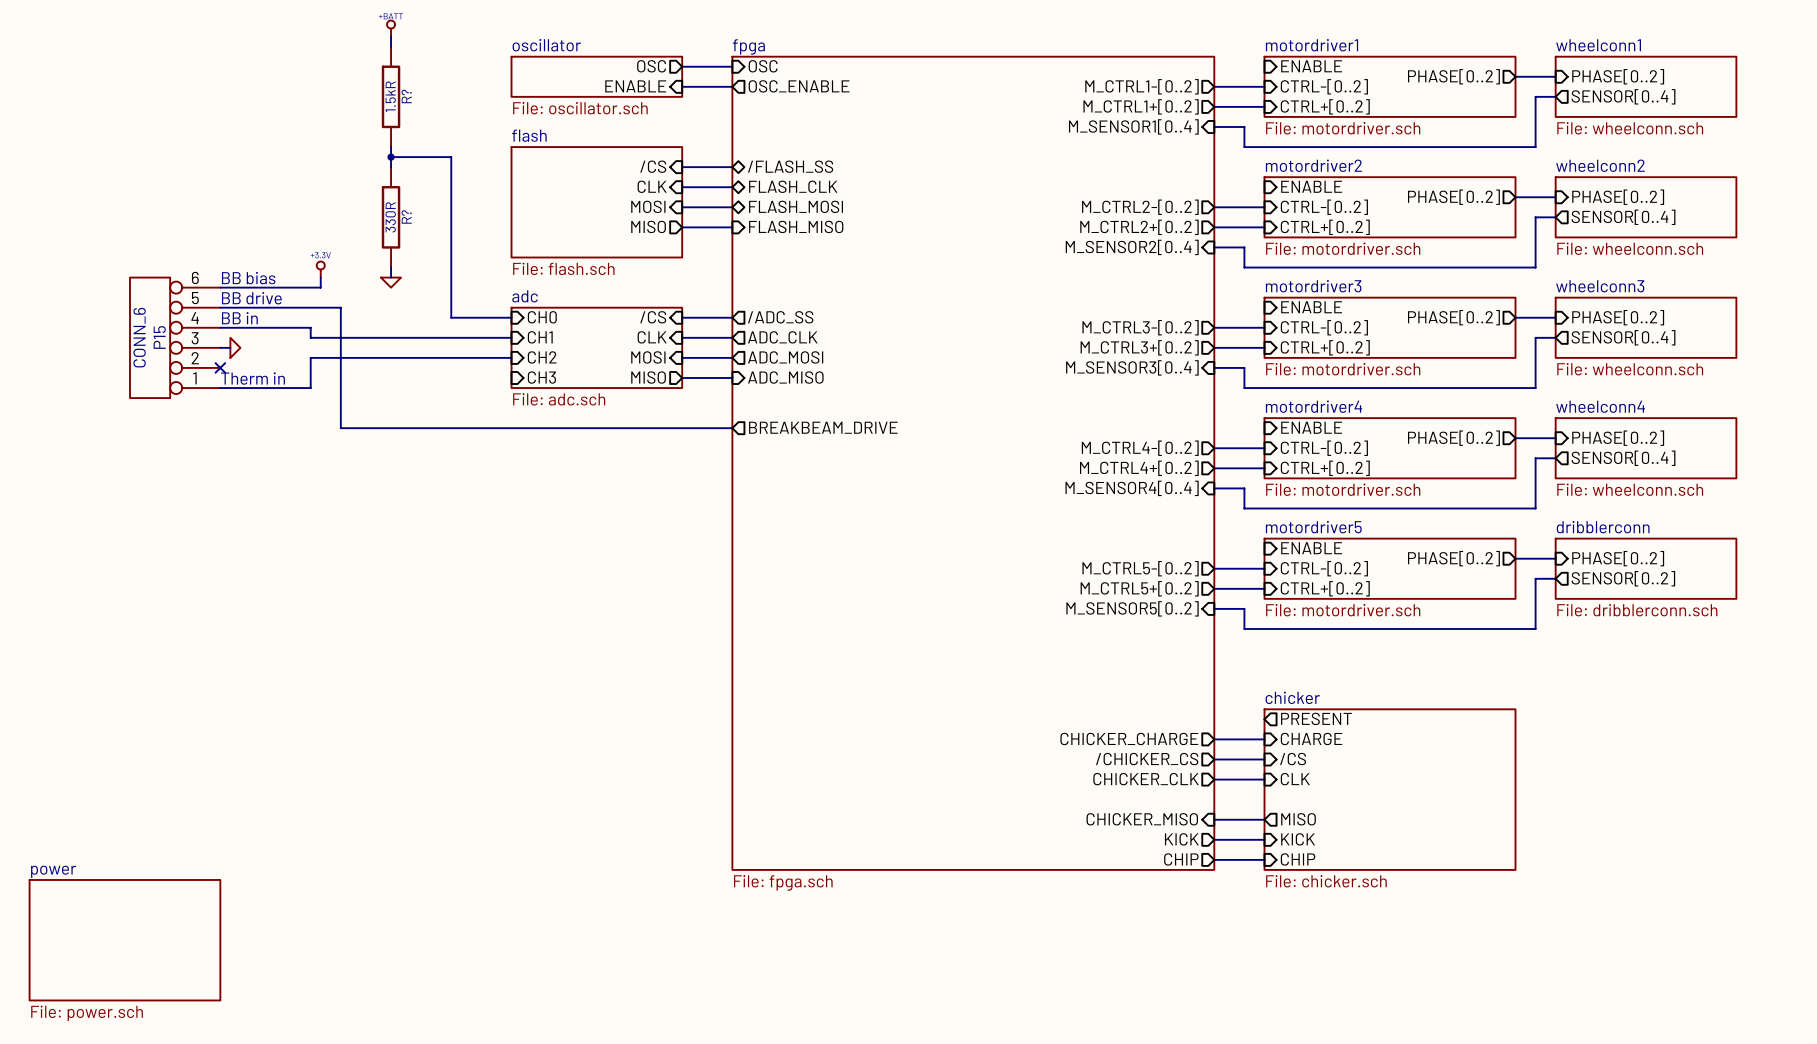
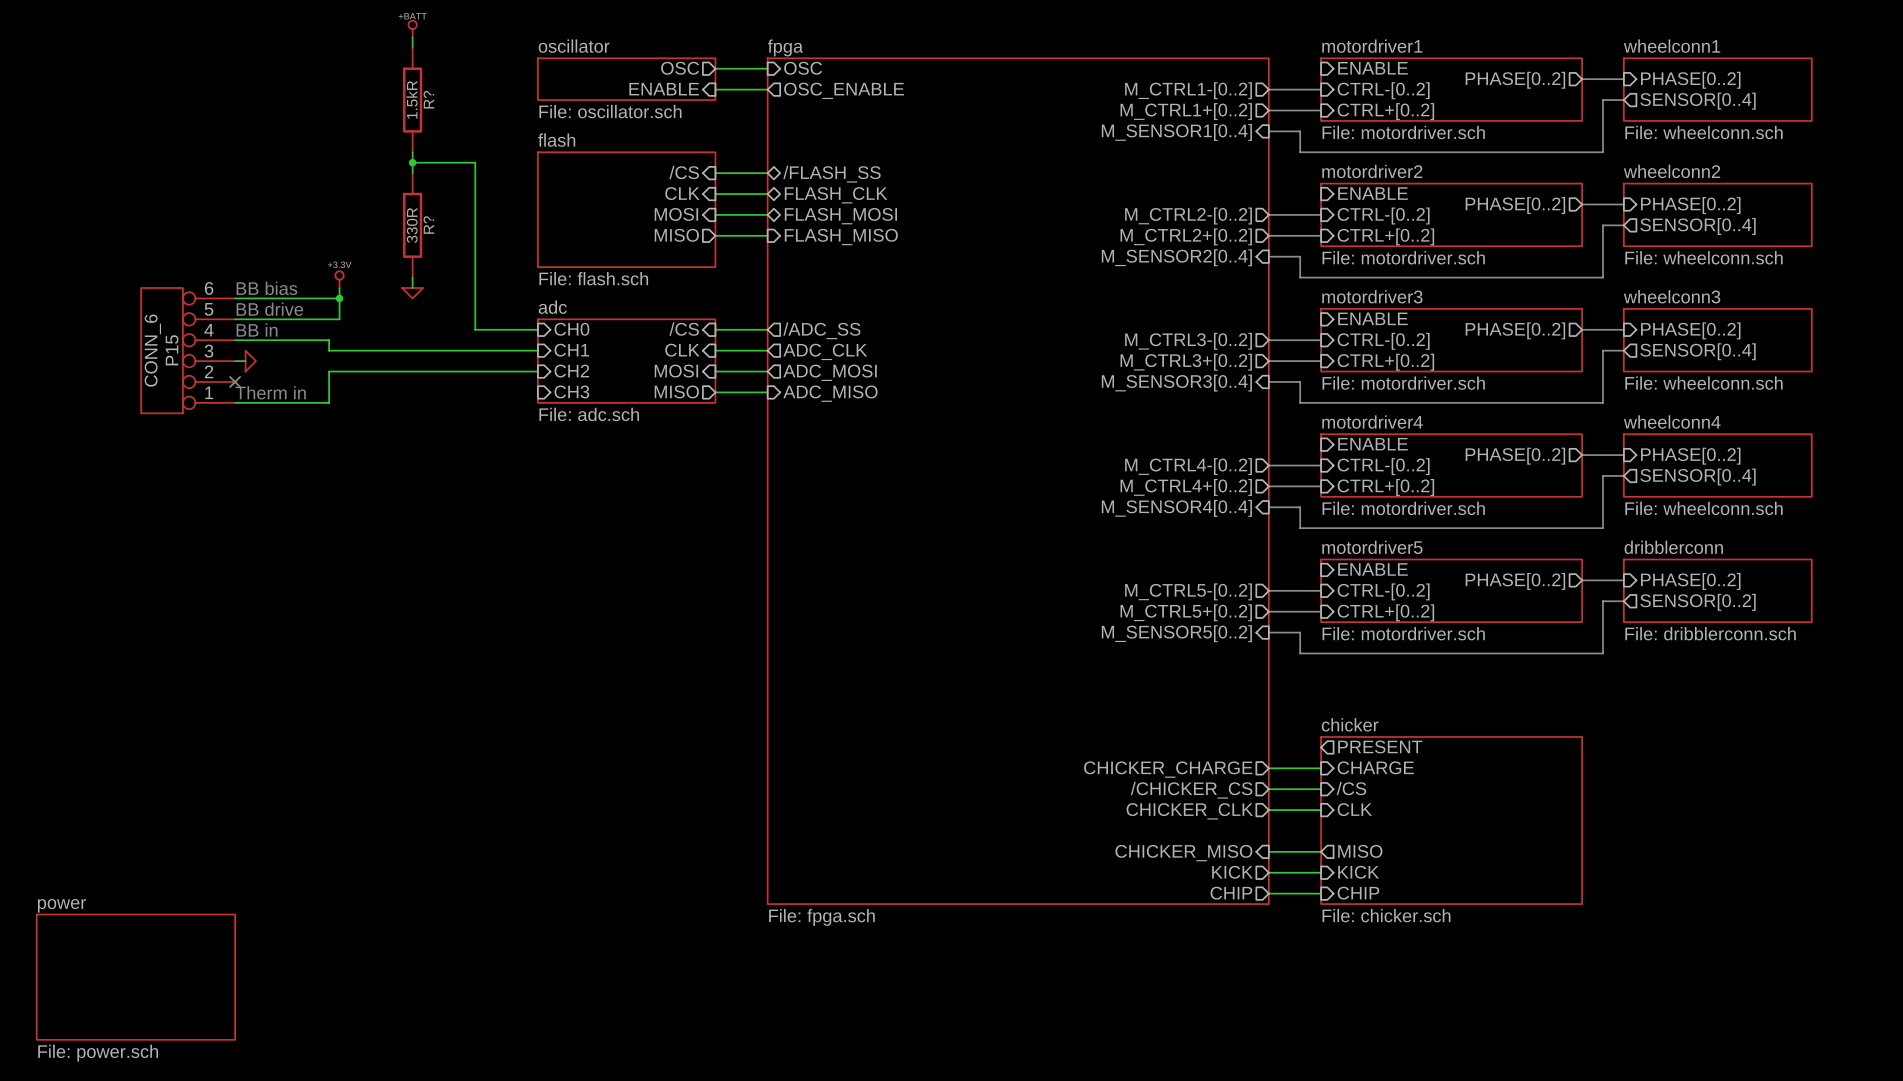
junction: none -> (339, 298)
wire: (320, 307) (340, 307) (340, 428) (732, 428) -> (339, 319) (339, 298)
sheet pin: BREAKBEAM_DRIVE (823, 427) -> none

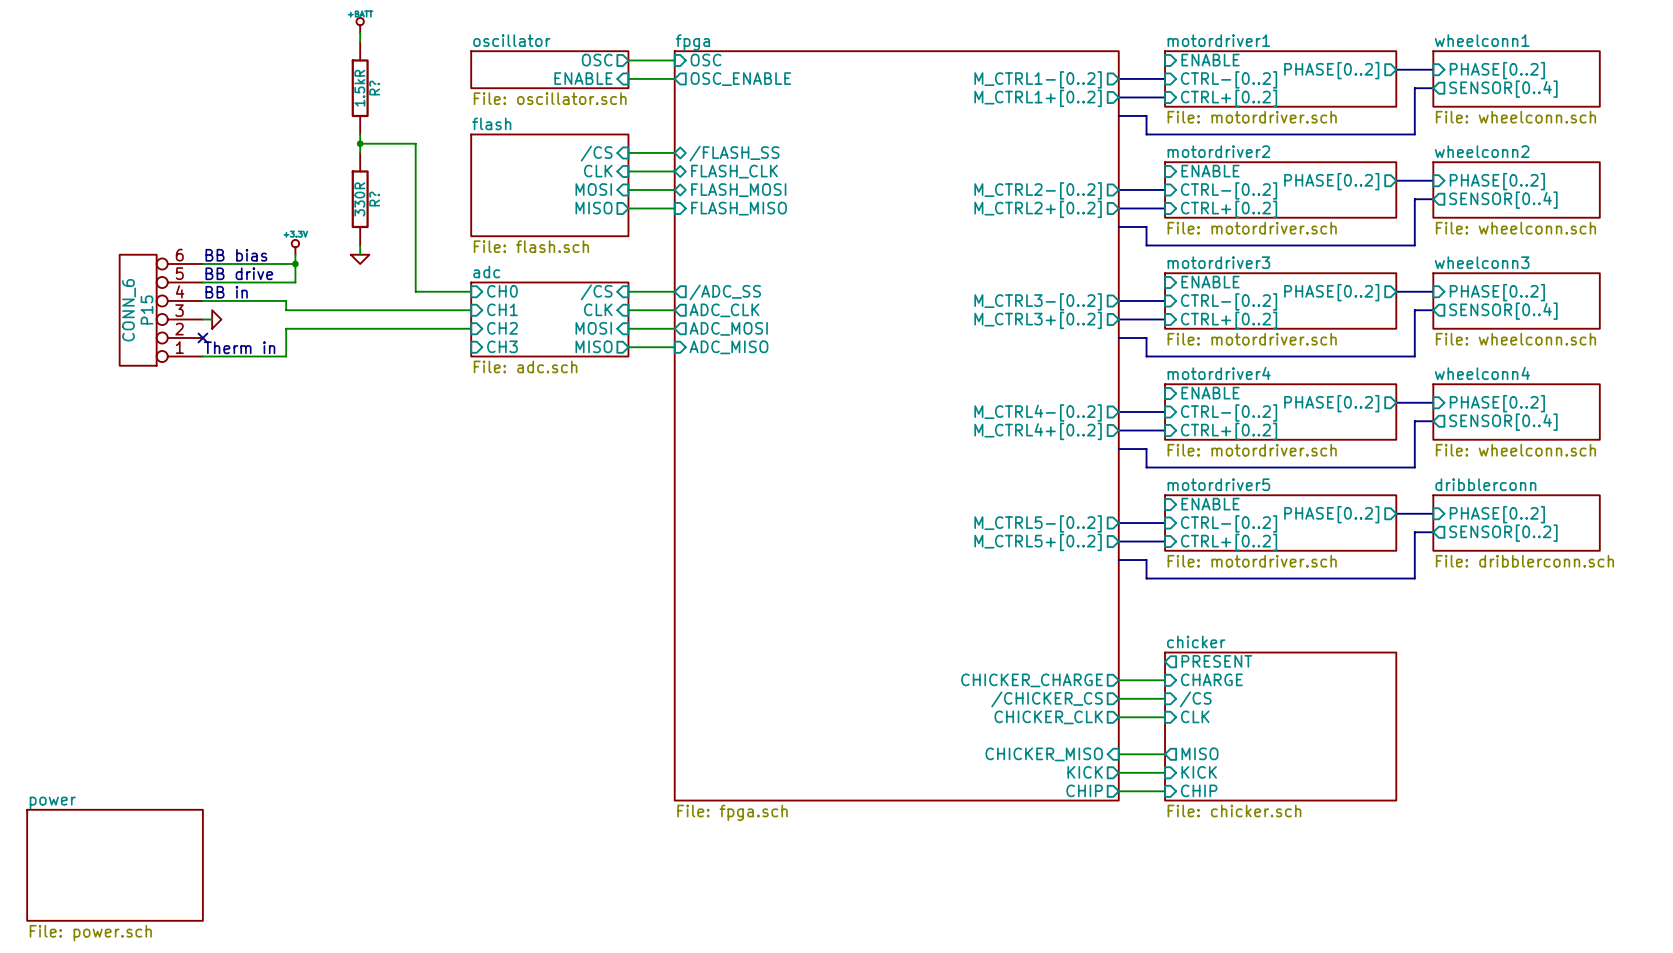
sheet pin: M_SENSOR1[0..4] (1176, 132) -> none
sheet pin: M_SENSOR2[0..4] (1176, 257) -> none
sheet pin: M_SENSOR3[0..4] (1176, 383) -> none
sheet pin: M_SENSOR4[0..4] (1176, 508) -> none
sheet pin: M_SENSOR5[0..2] (1176, 633) -> none

